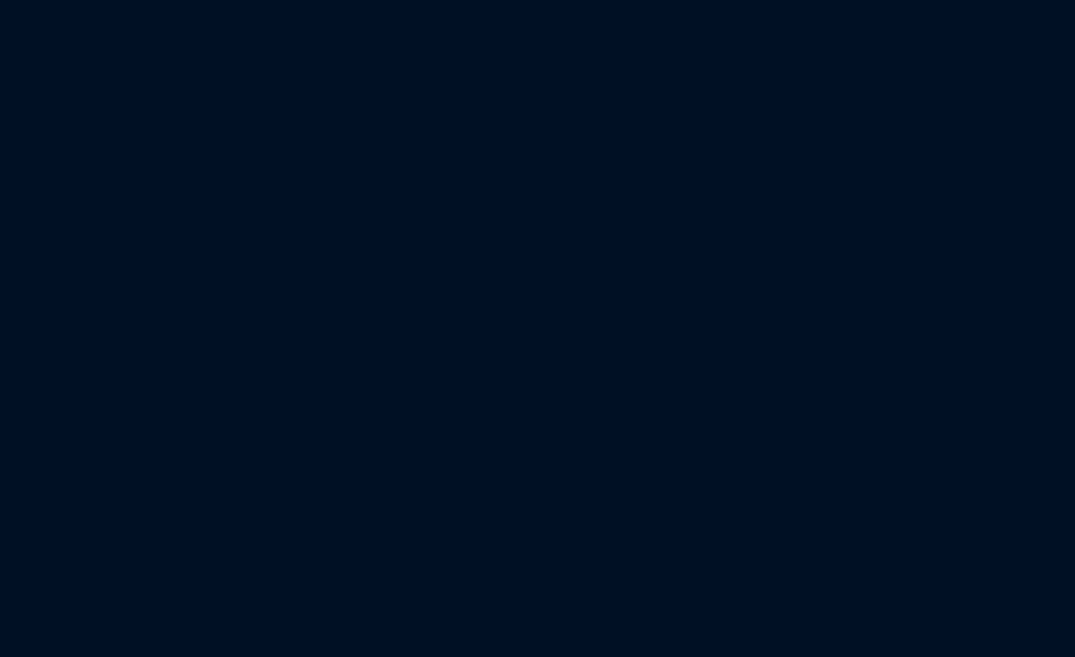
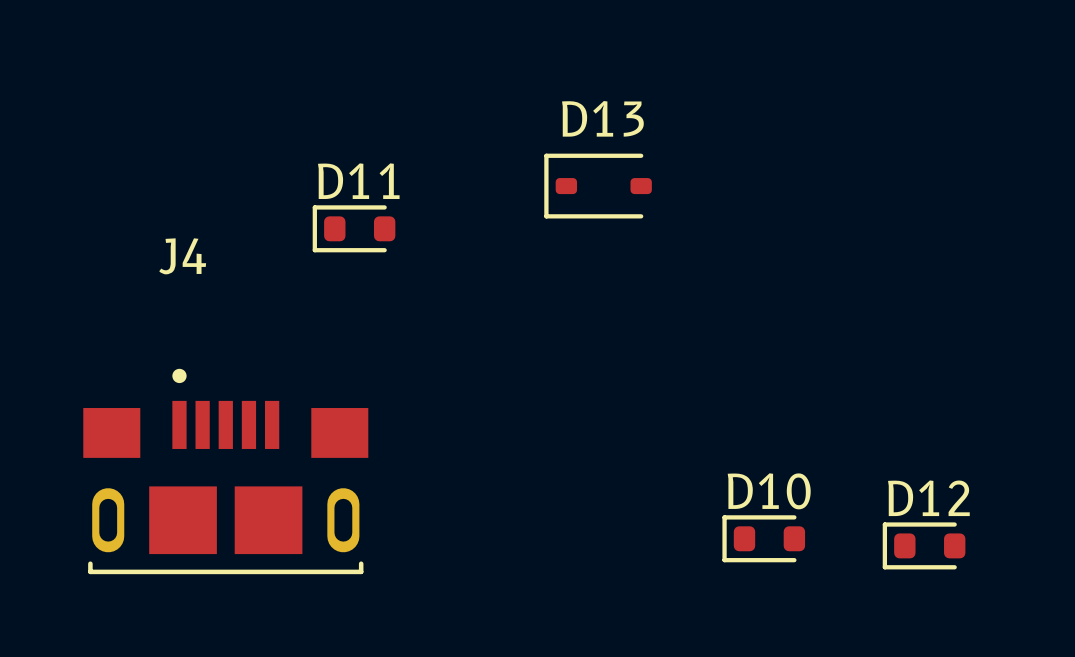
D13: none -> (598, 186)
D11: none -> (354, 228)
J4: none -> (225, 471)
D10: none -> (763, 538)
D12: none -> (924, 545)

